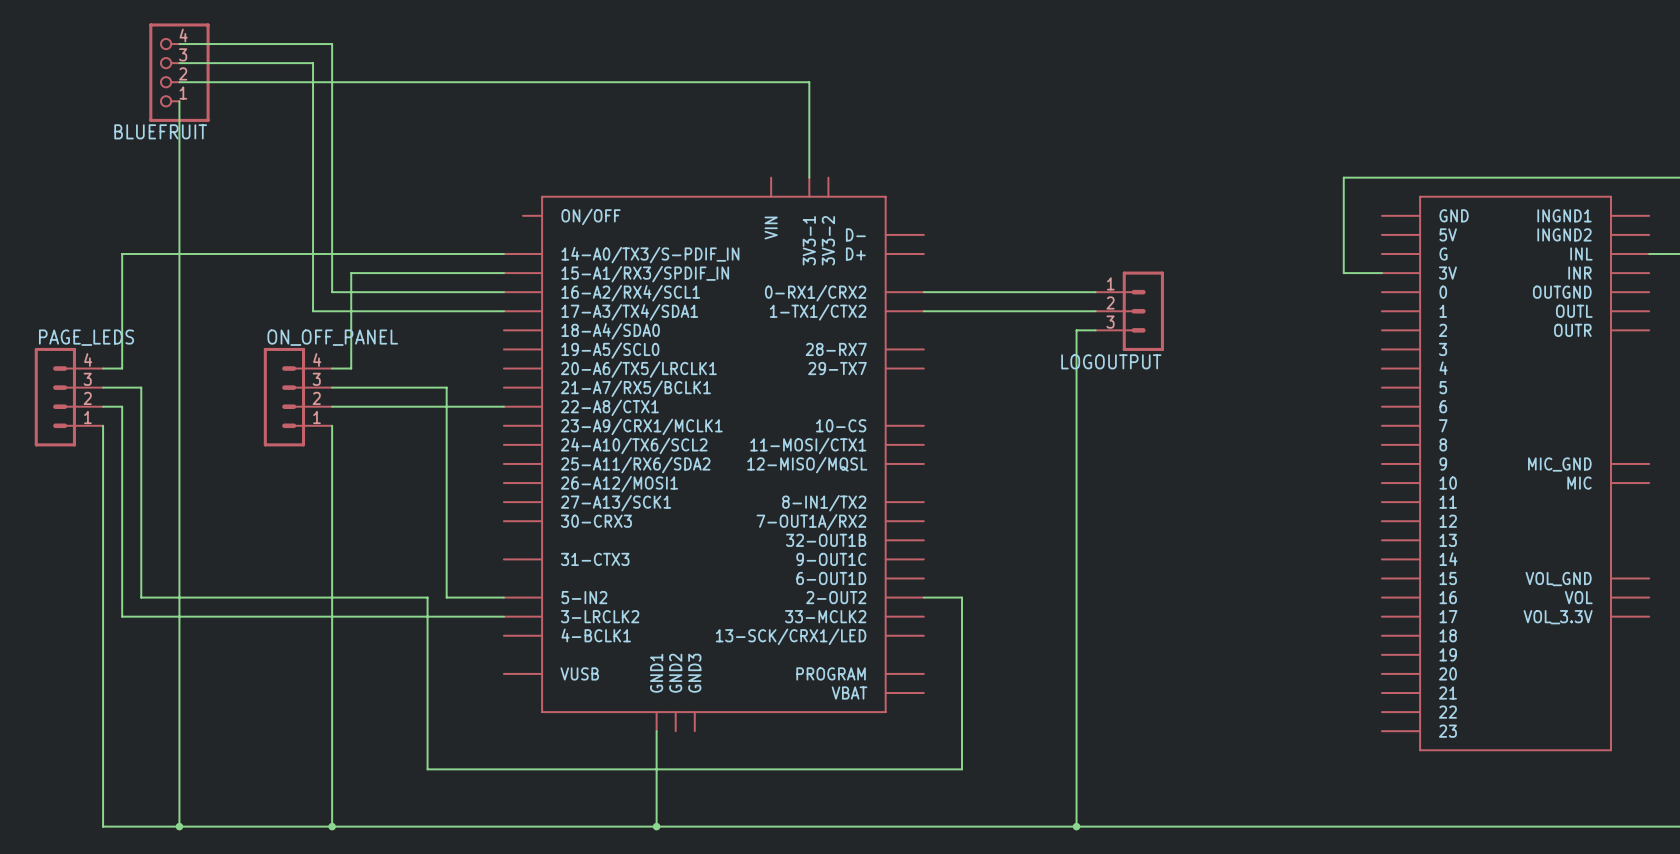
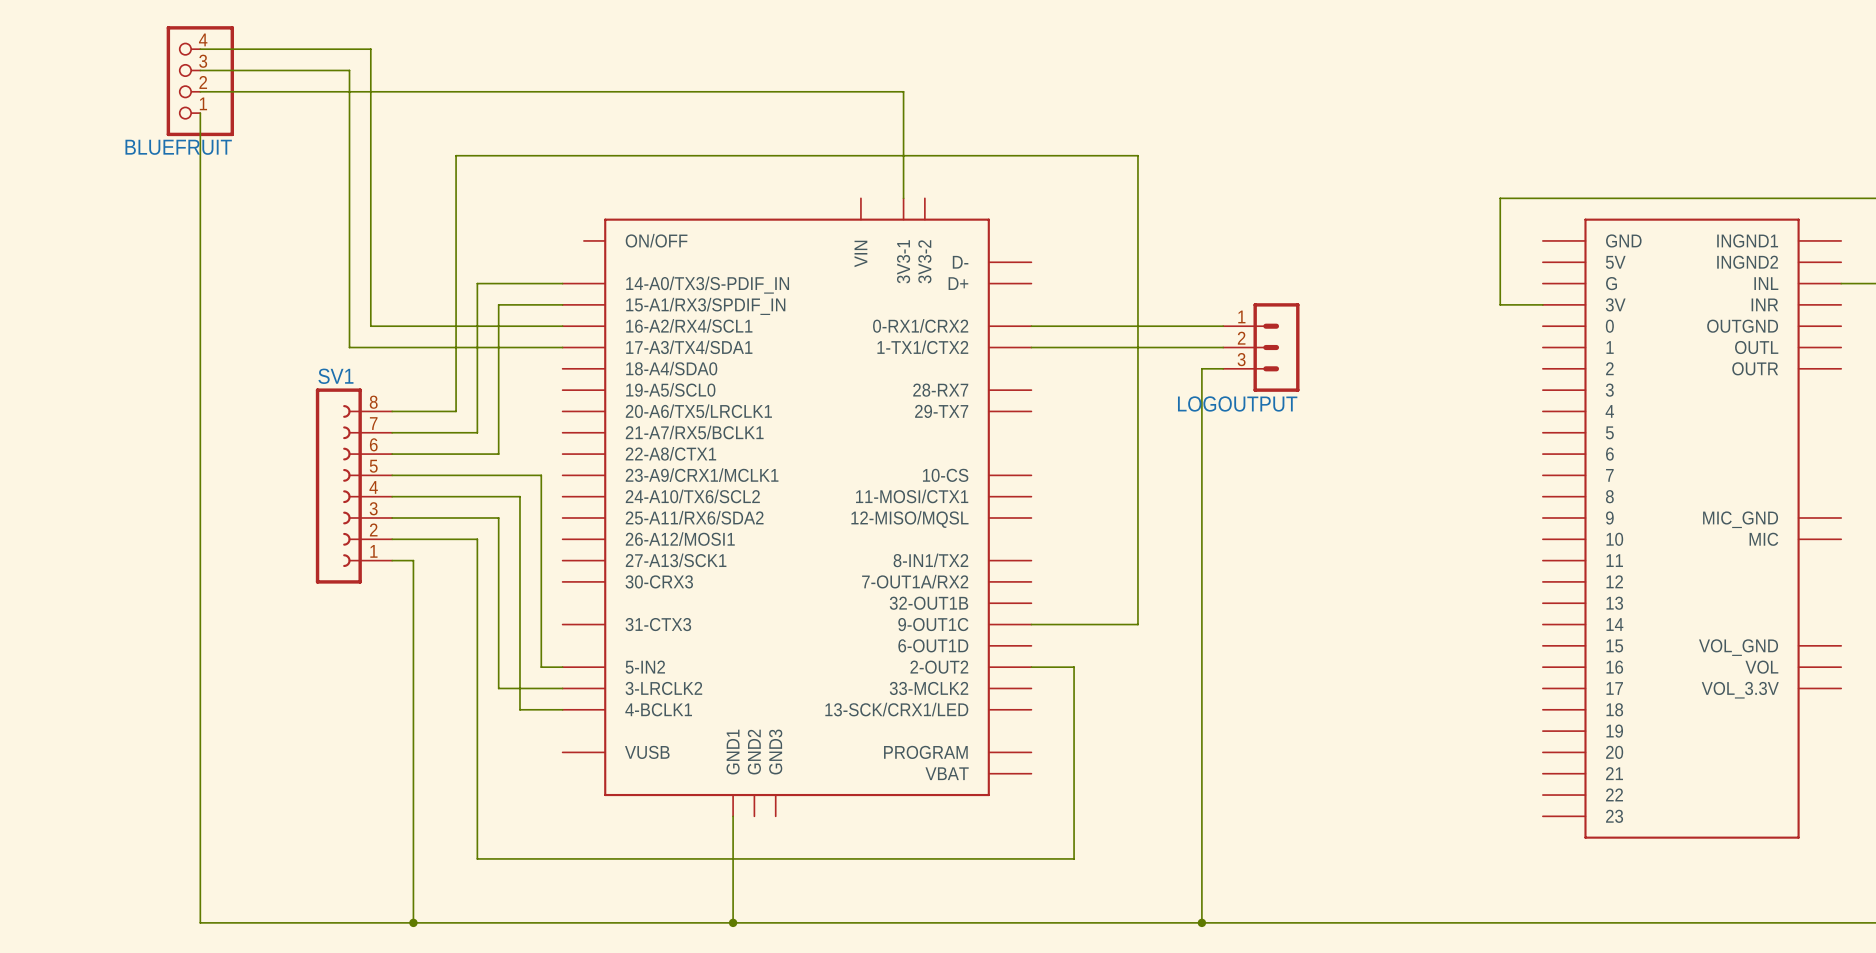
wire: (427, 254) (122, 254) (122, 368) (103, 368) -> (477, 283) (477, 432)
wire: (446, 273) (351, 273) (351, 368) (332, 368) -> none
wire: none -> (392, 411) (456, 411) (456, 155) (1137, 155) (1137, 624) (1031, 624)
wire: (103, 387) (141, 387) (141, 597) (427, 597) -> (392, 539) (477, 539) (477, 667)
wire: (427, 387) (446, 387) -> (498, 304) (498, 432)
PAGE_LEDS: (68, 397) -> none
ON_OFF_PANEL: (297, 397) -> none
wire: (103, 406) (122, 406) (122, 616) (446, 616) -> none
wire: (503, 406) (446, 406) (446, 463) -> (392, 517) (498, 517)
wire: (103, 425) (103, 826) (179, 826) -> none
wire: (332, 425) (332, 826) -> none
wire: none -> (392, 475) (541, 475) (541, 667)
SV1: none -> (353, 486)
wire: none -> (392, 496) (519, 496) (519, 709) (562, 709)
wire: none -> (392, 560) (413, 560) (413, 922)
wire: (446, 597) (484, 597) -> (498, 667) (498, 688)
junction: (179, 826) -> none
junction position: (332, 826) -> (413, 922)

